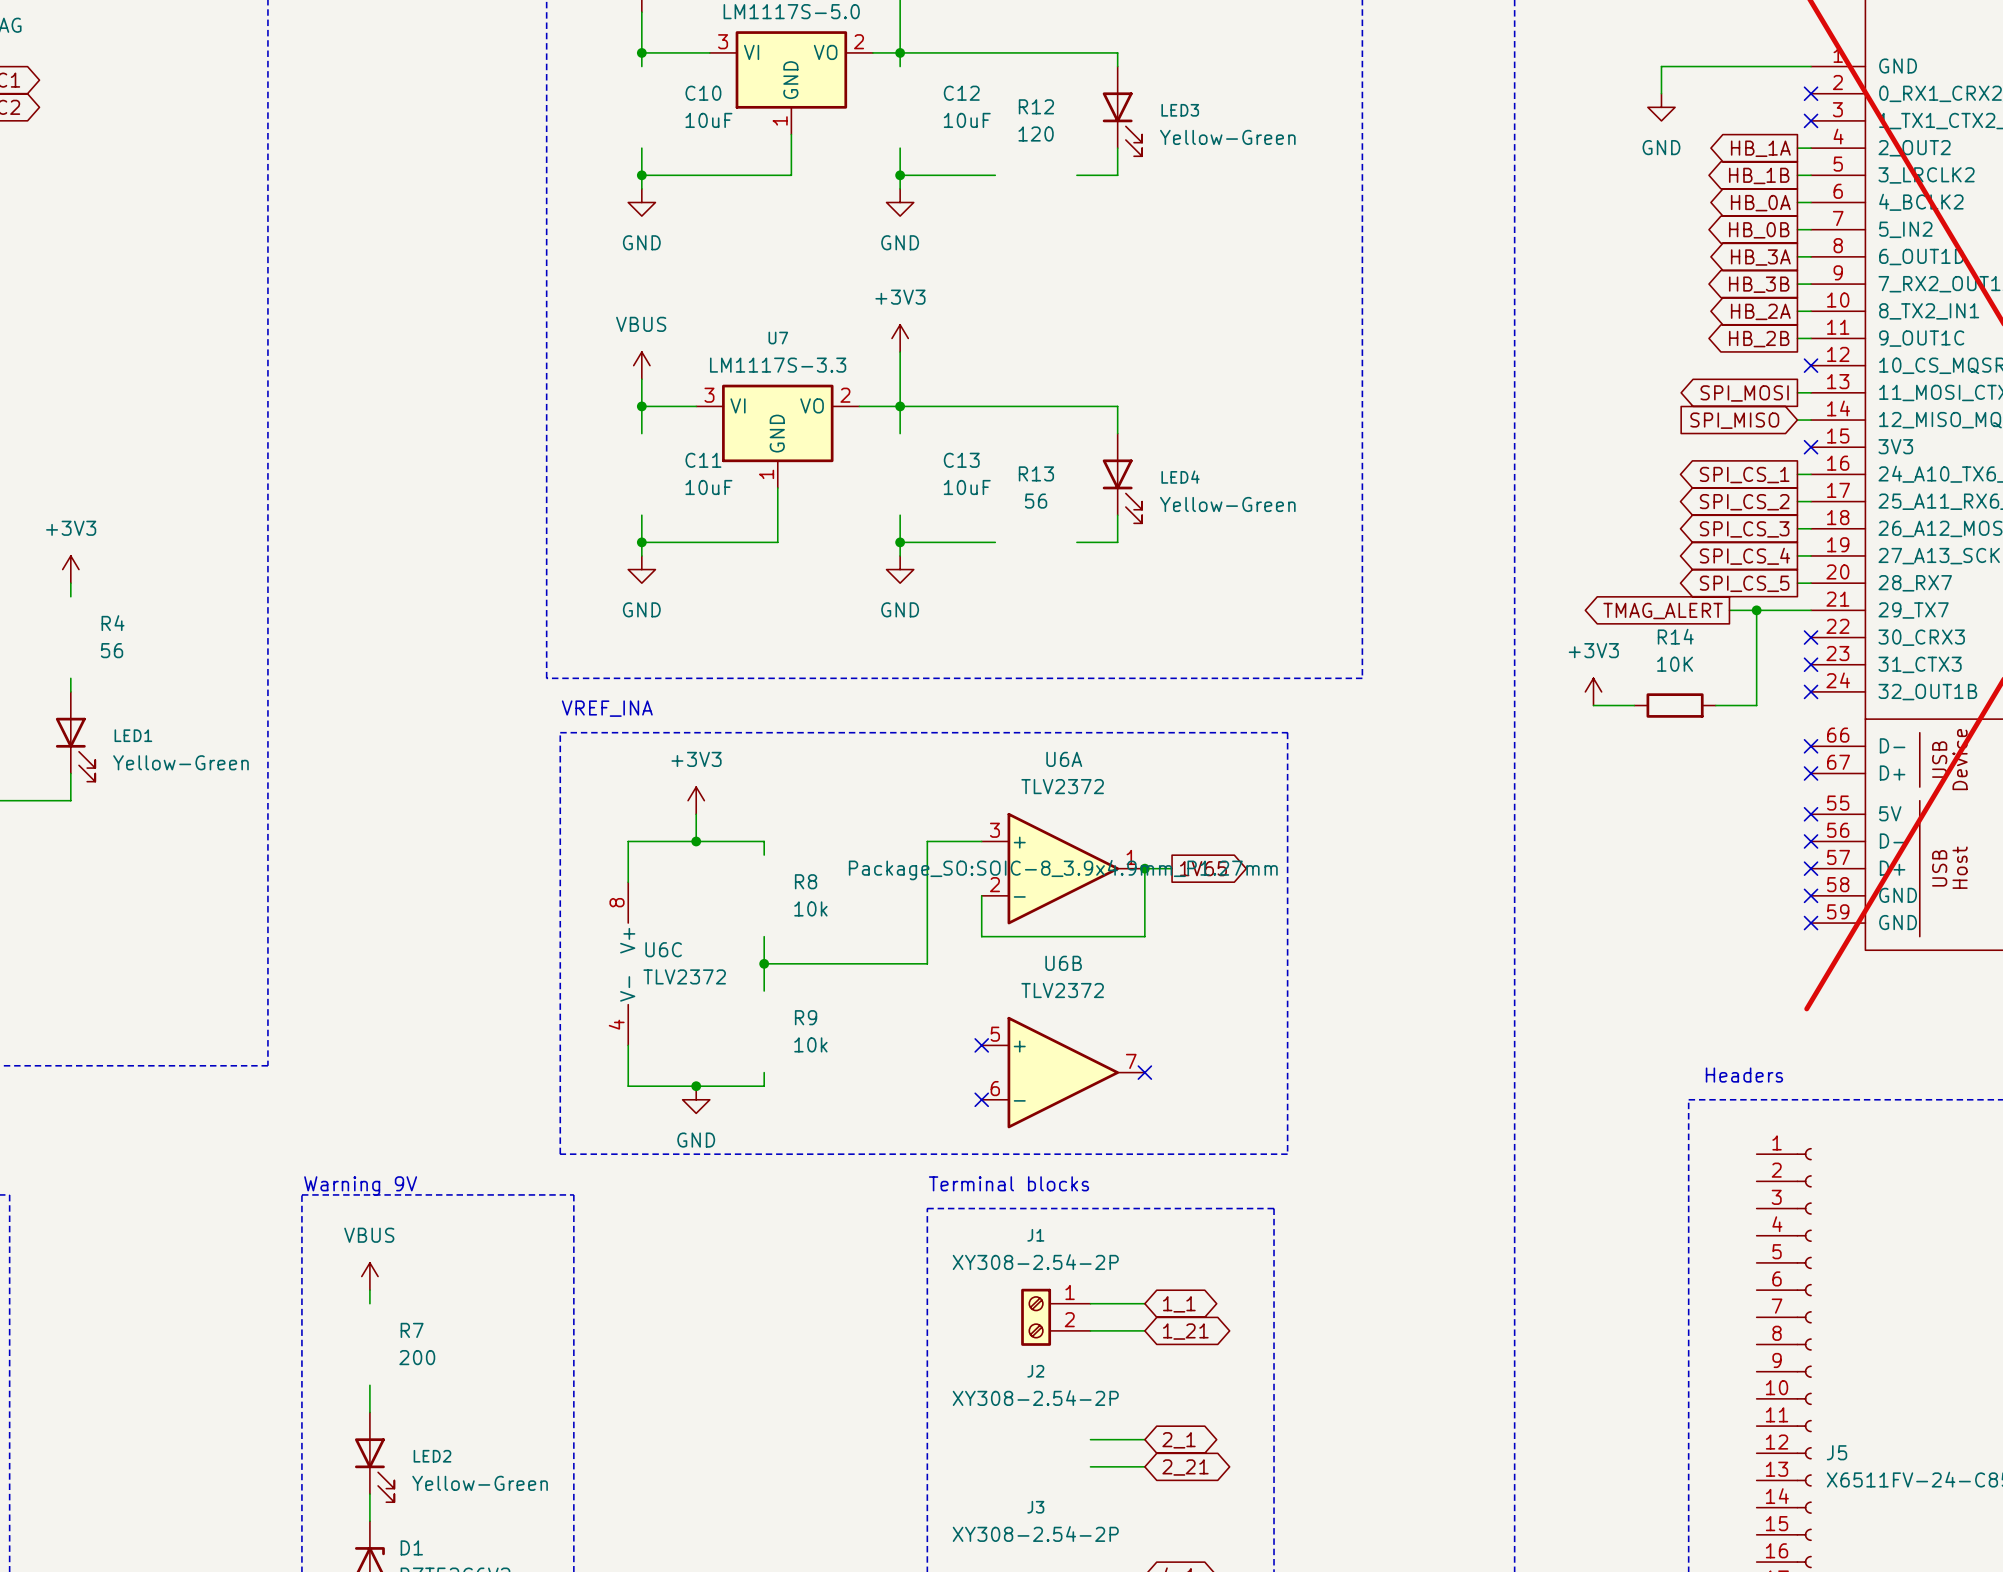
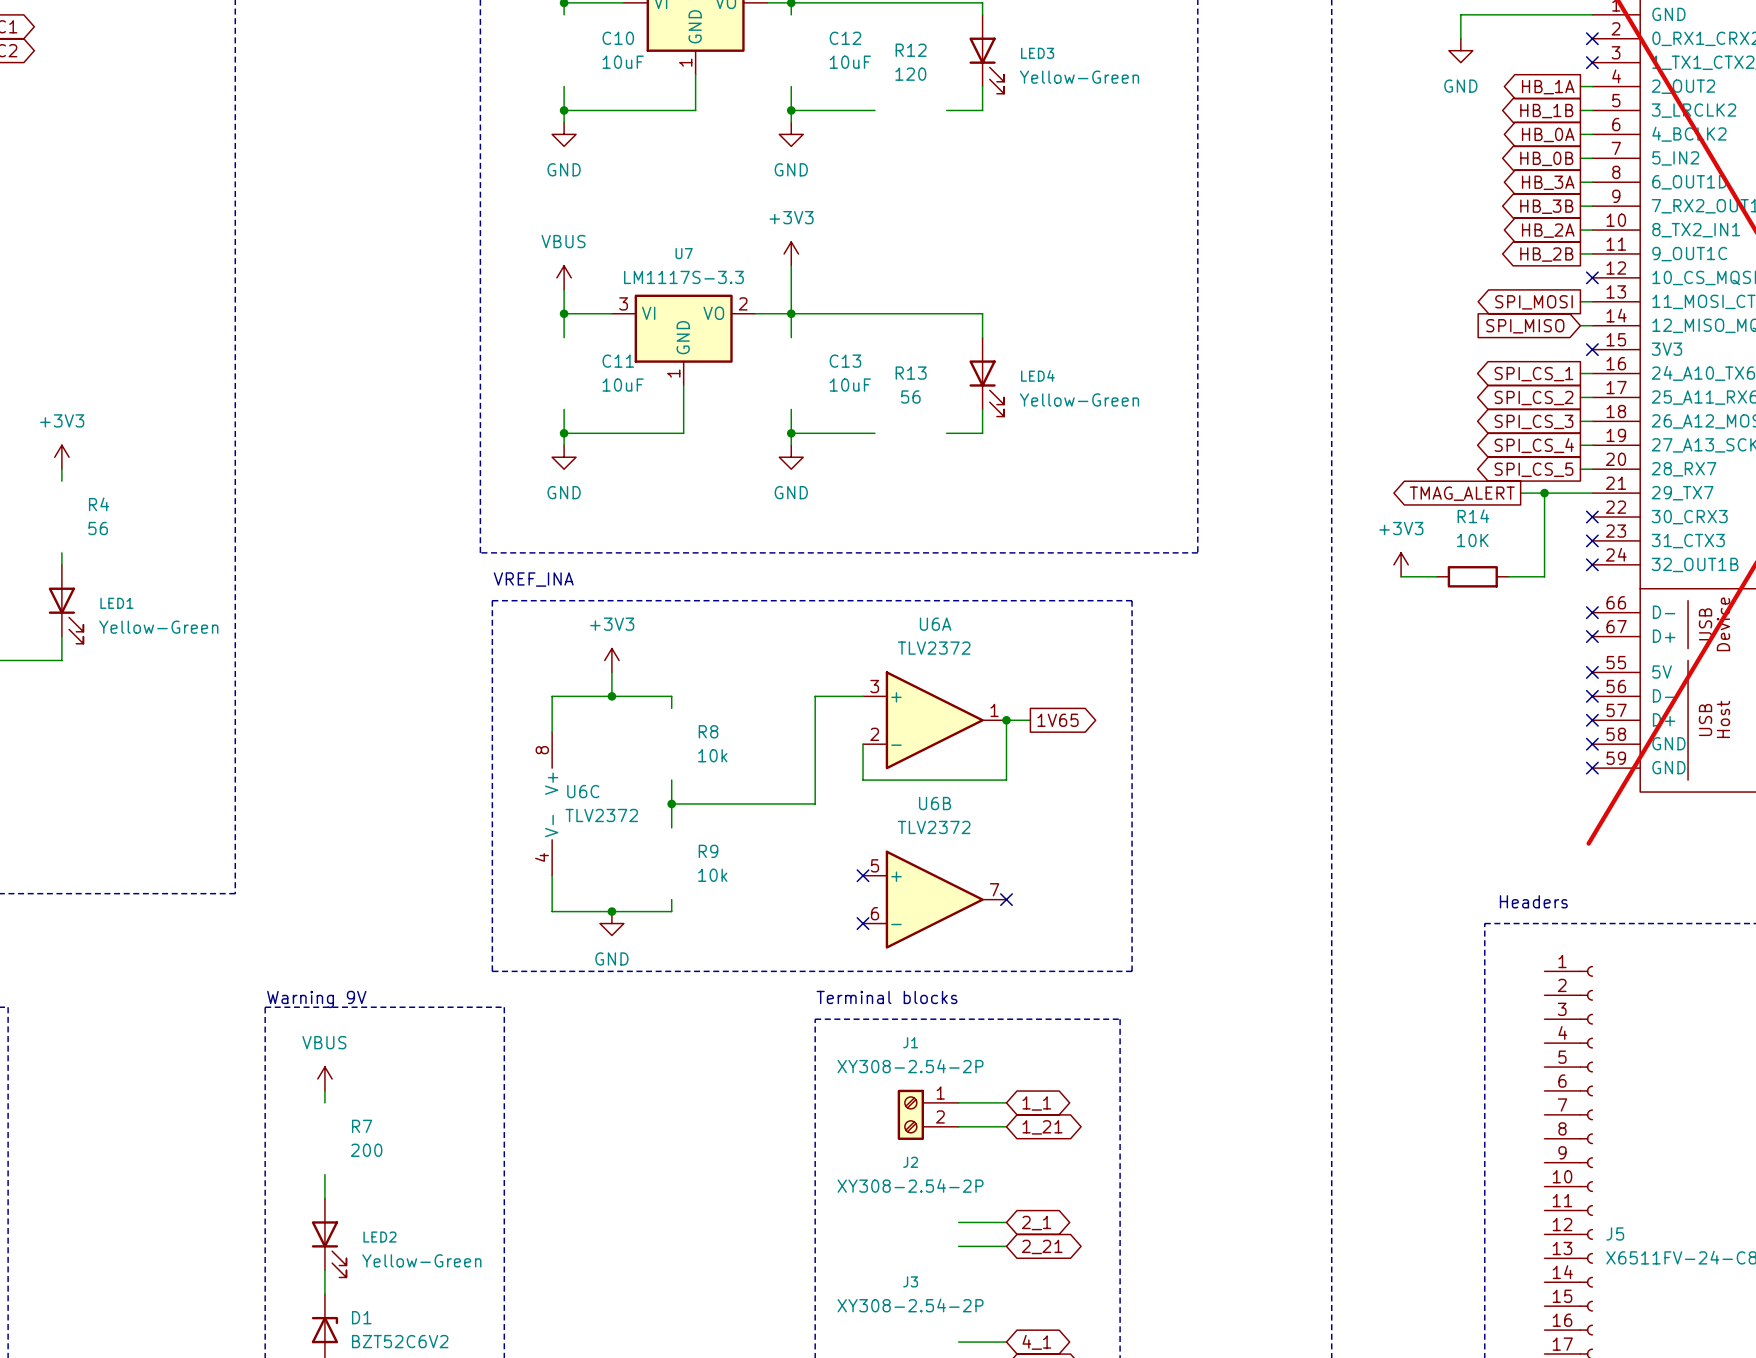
U6A text: Package_SO:SOIC-8_3.9x4.9mm_P1.27mm (1063, 870) -> none

